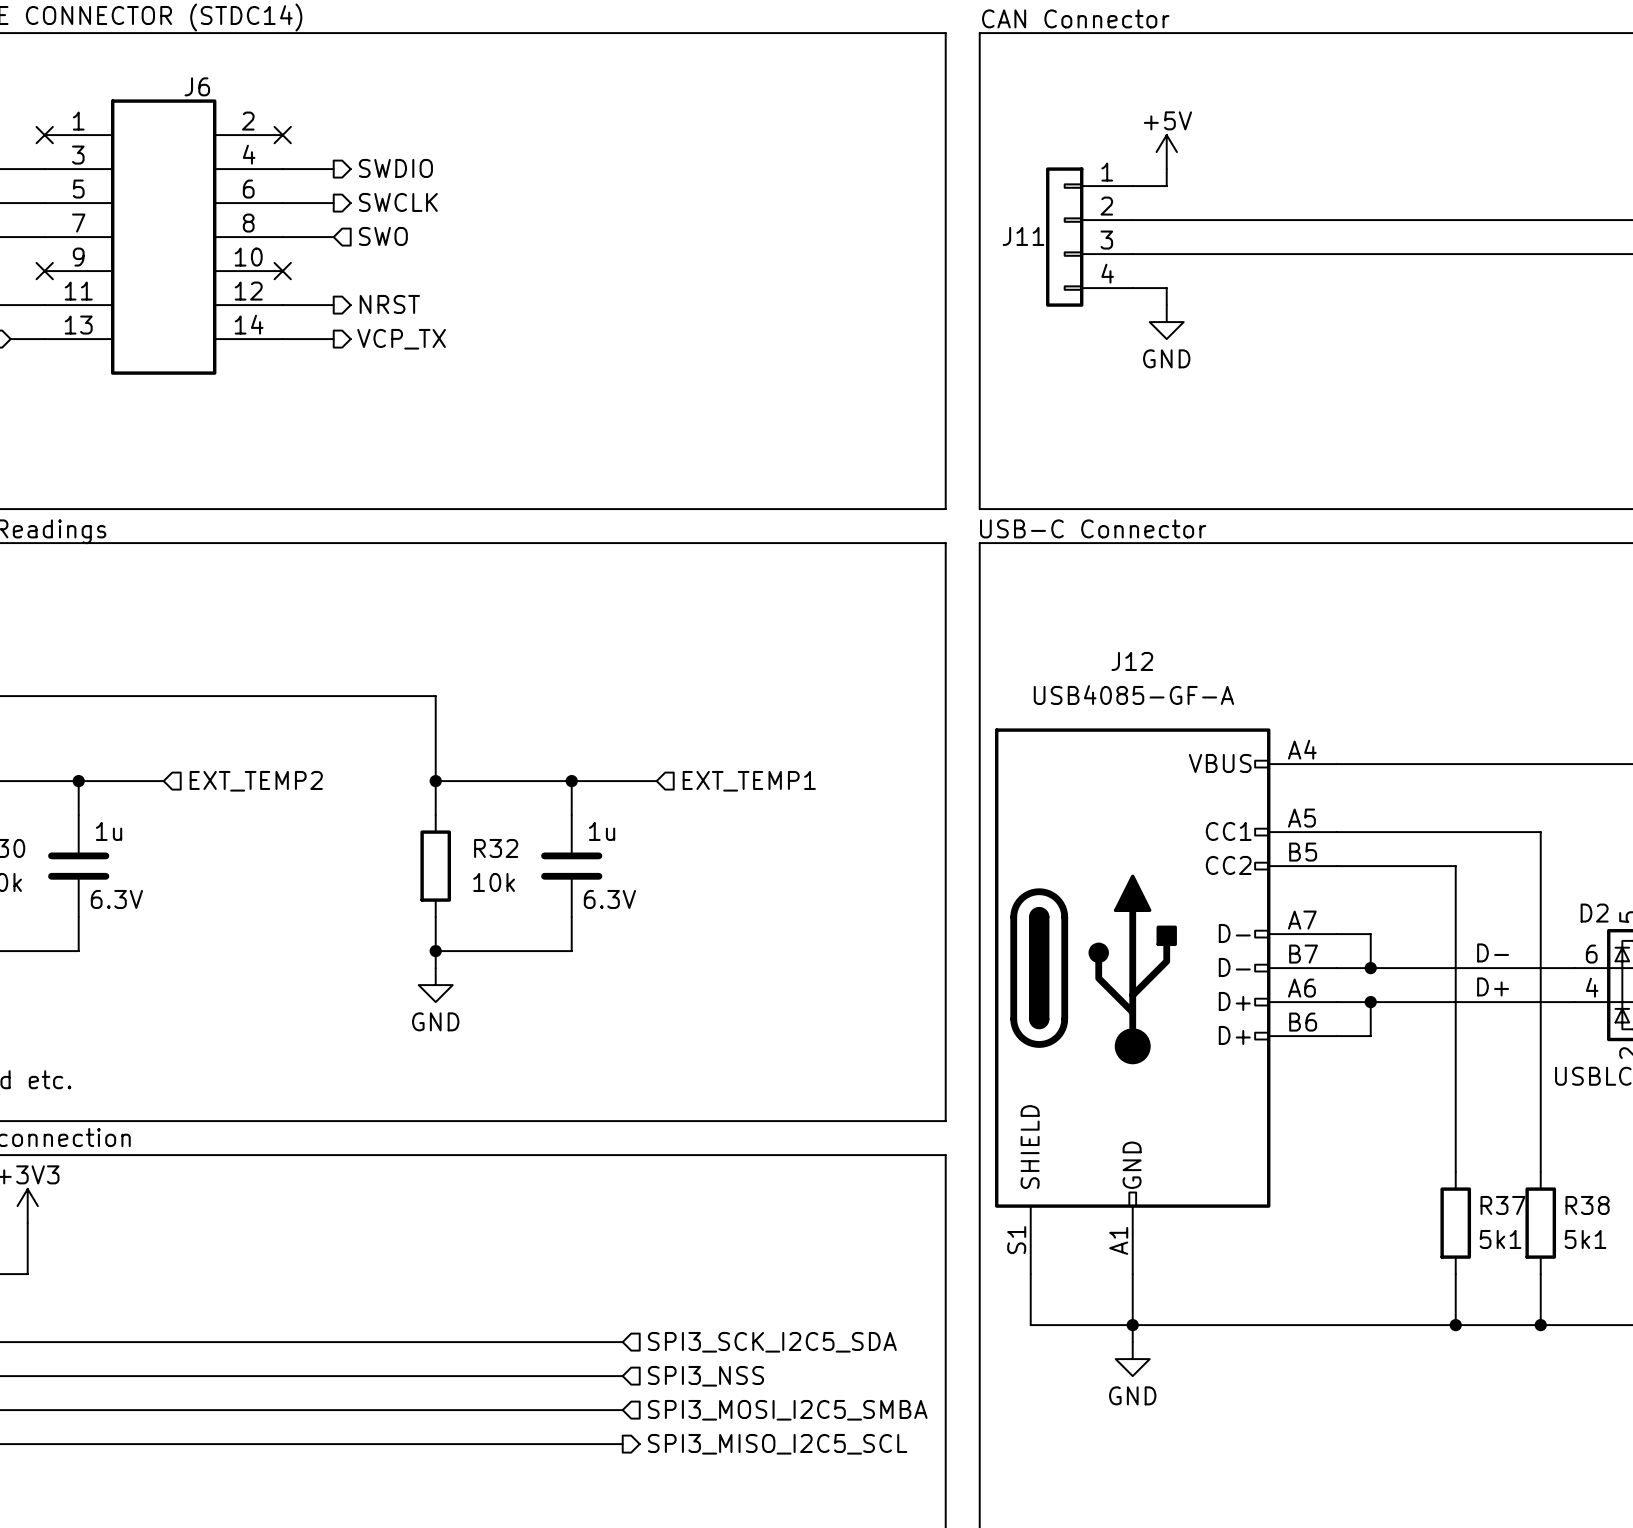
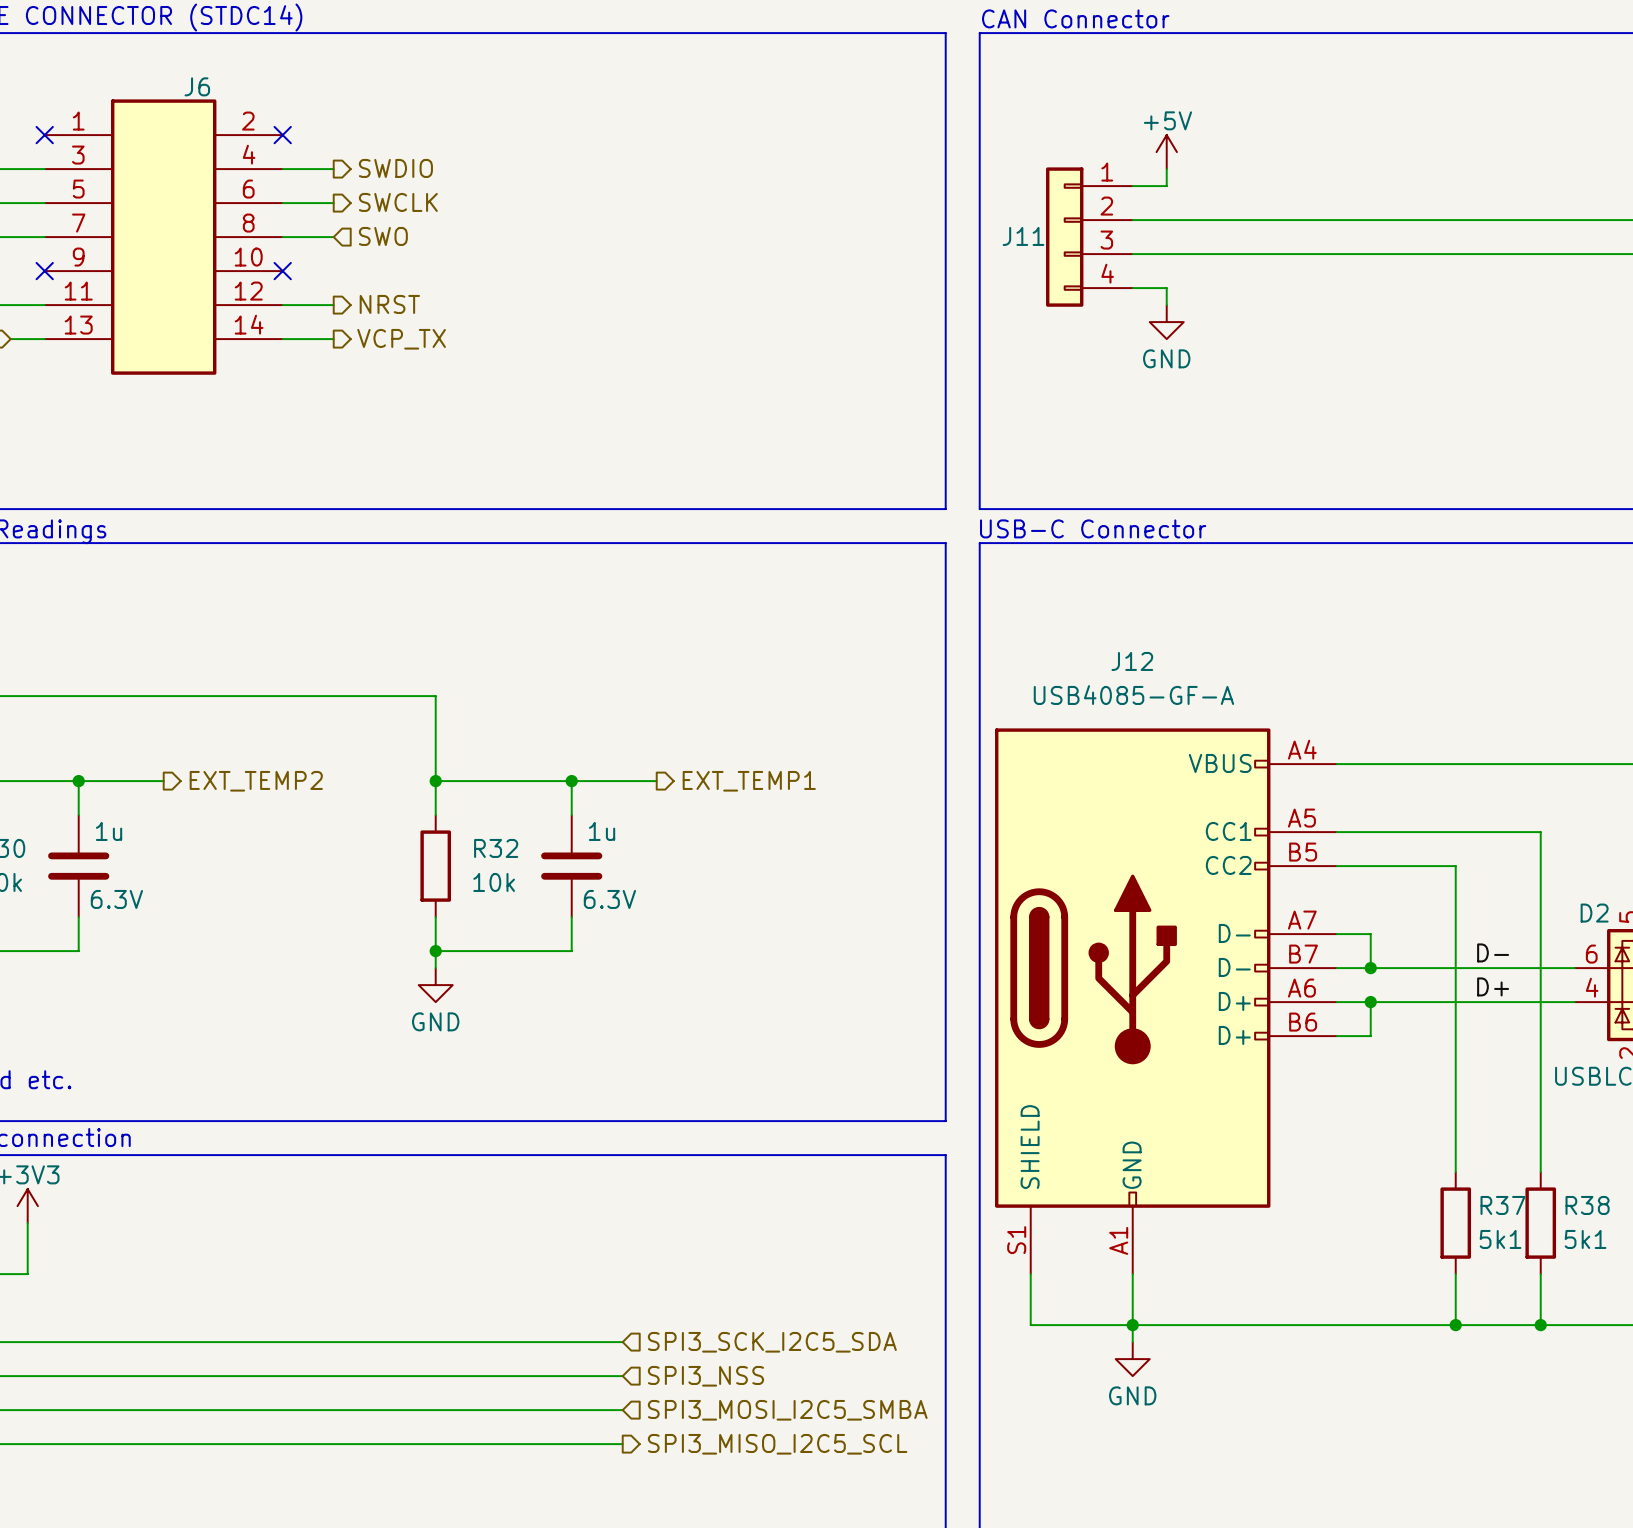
hierarchical label shape: input (256, 781) -> output (256, 781)
hierarchical label shape: input (749, 781) -> output (749, 781)

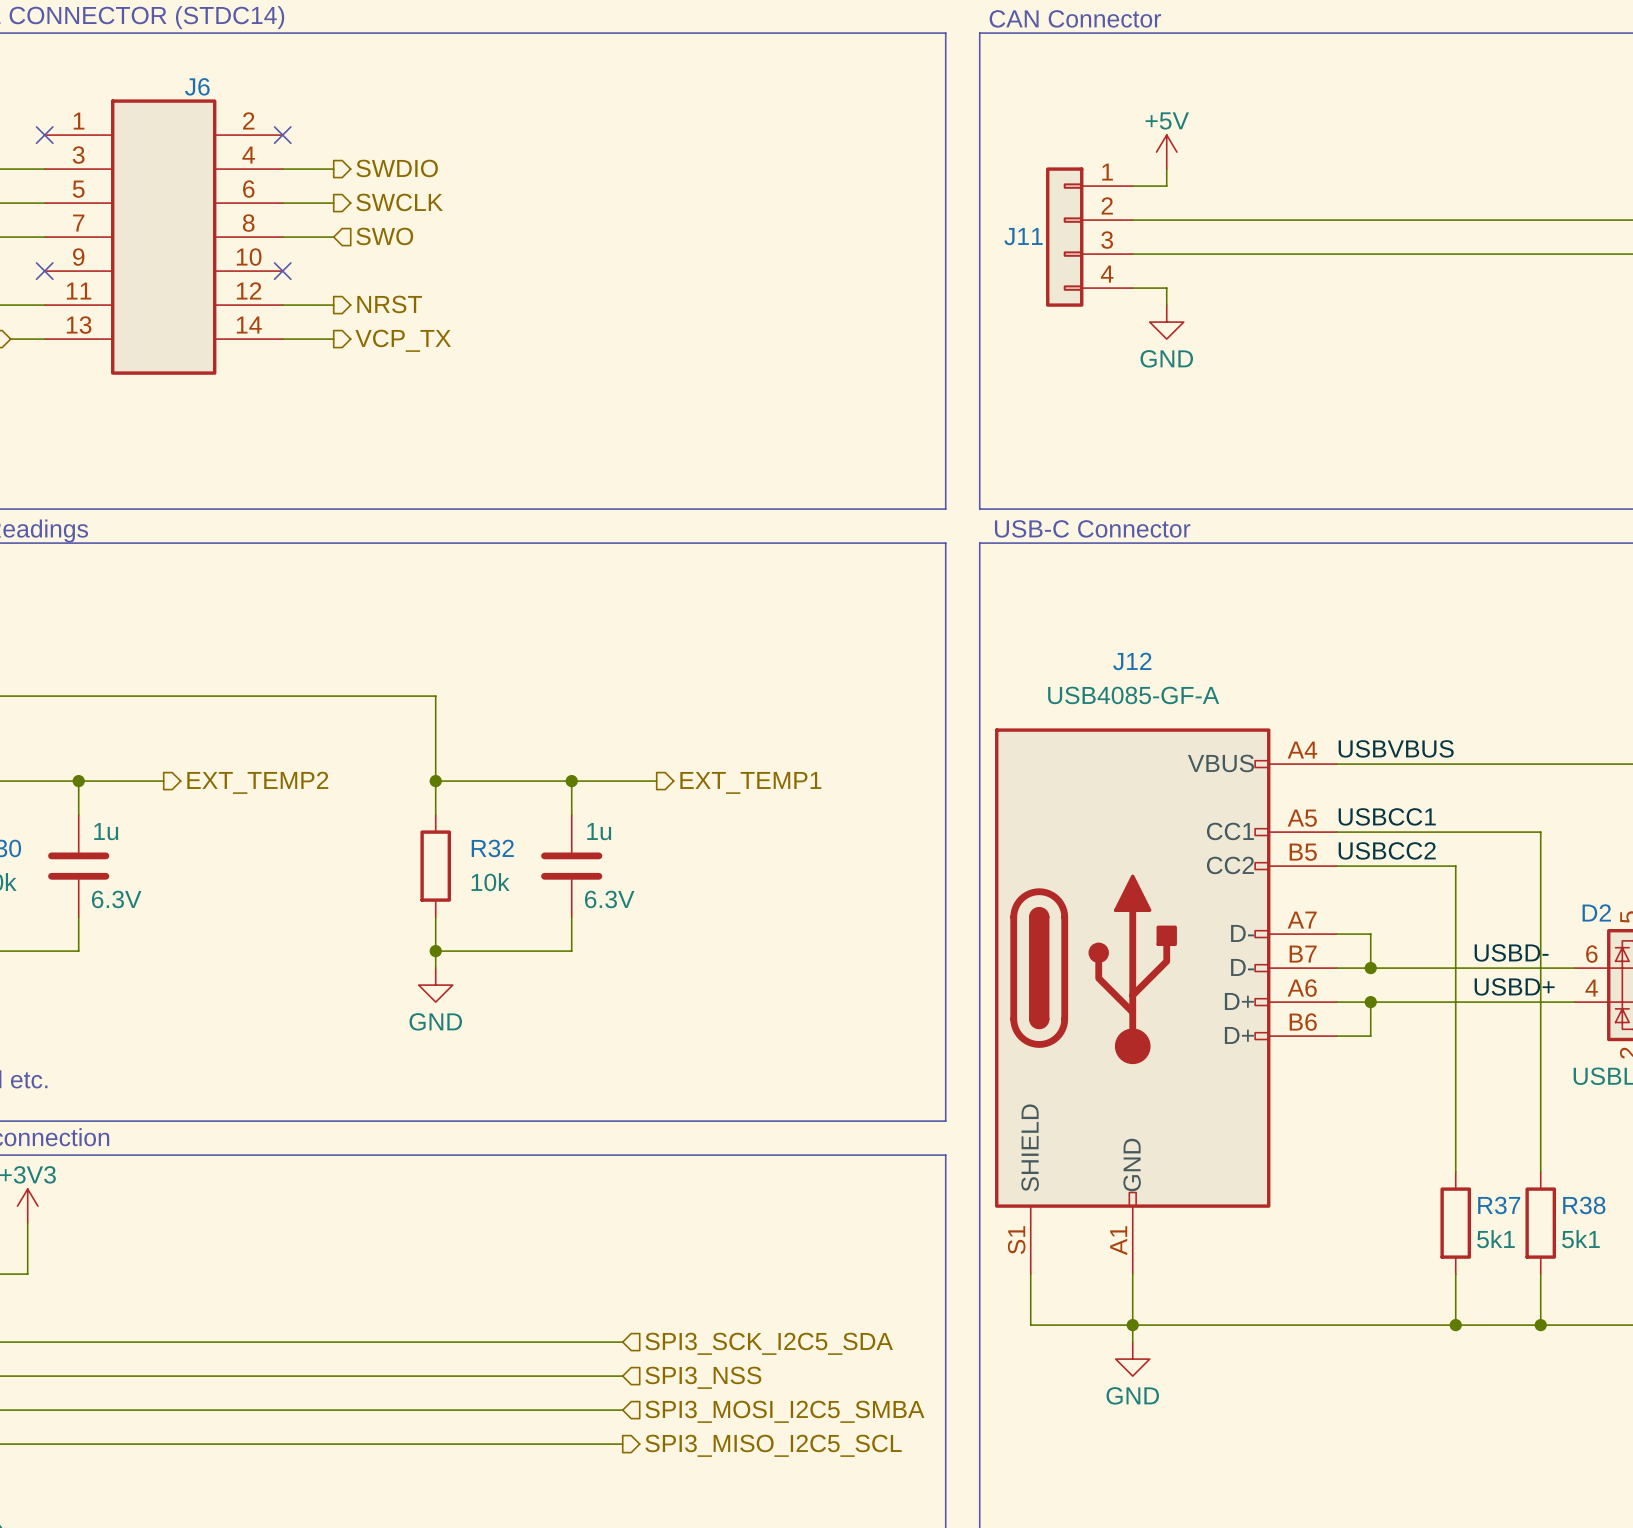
label: none -> USBVBUS (1396, 748)
label: none -> USBCC1 (1387, 816)
label: none -> USBCC2 (1387, 850)
label: D- (1493, 952) -> USBD- (1511, 952)
label: D+ (1493, 986) -> USBD+ (1514, 986)

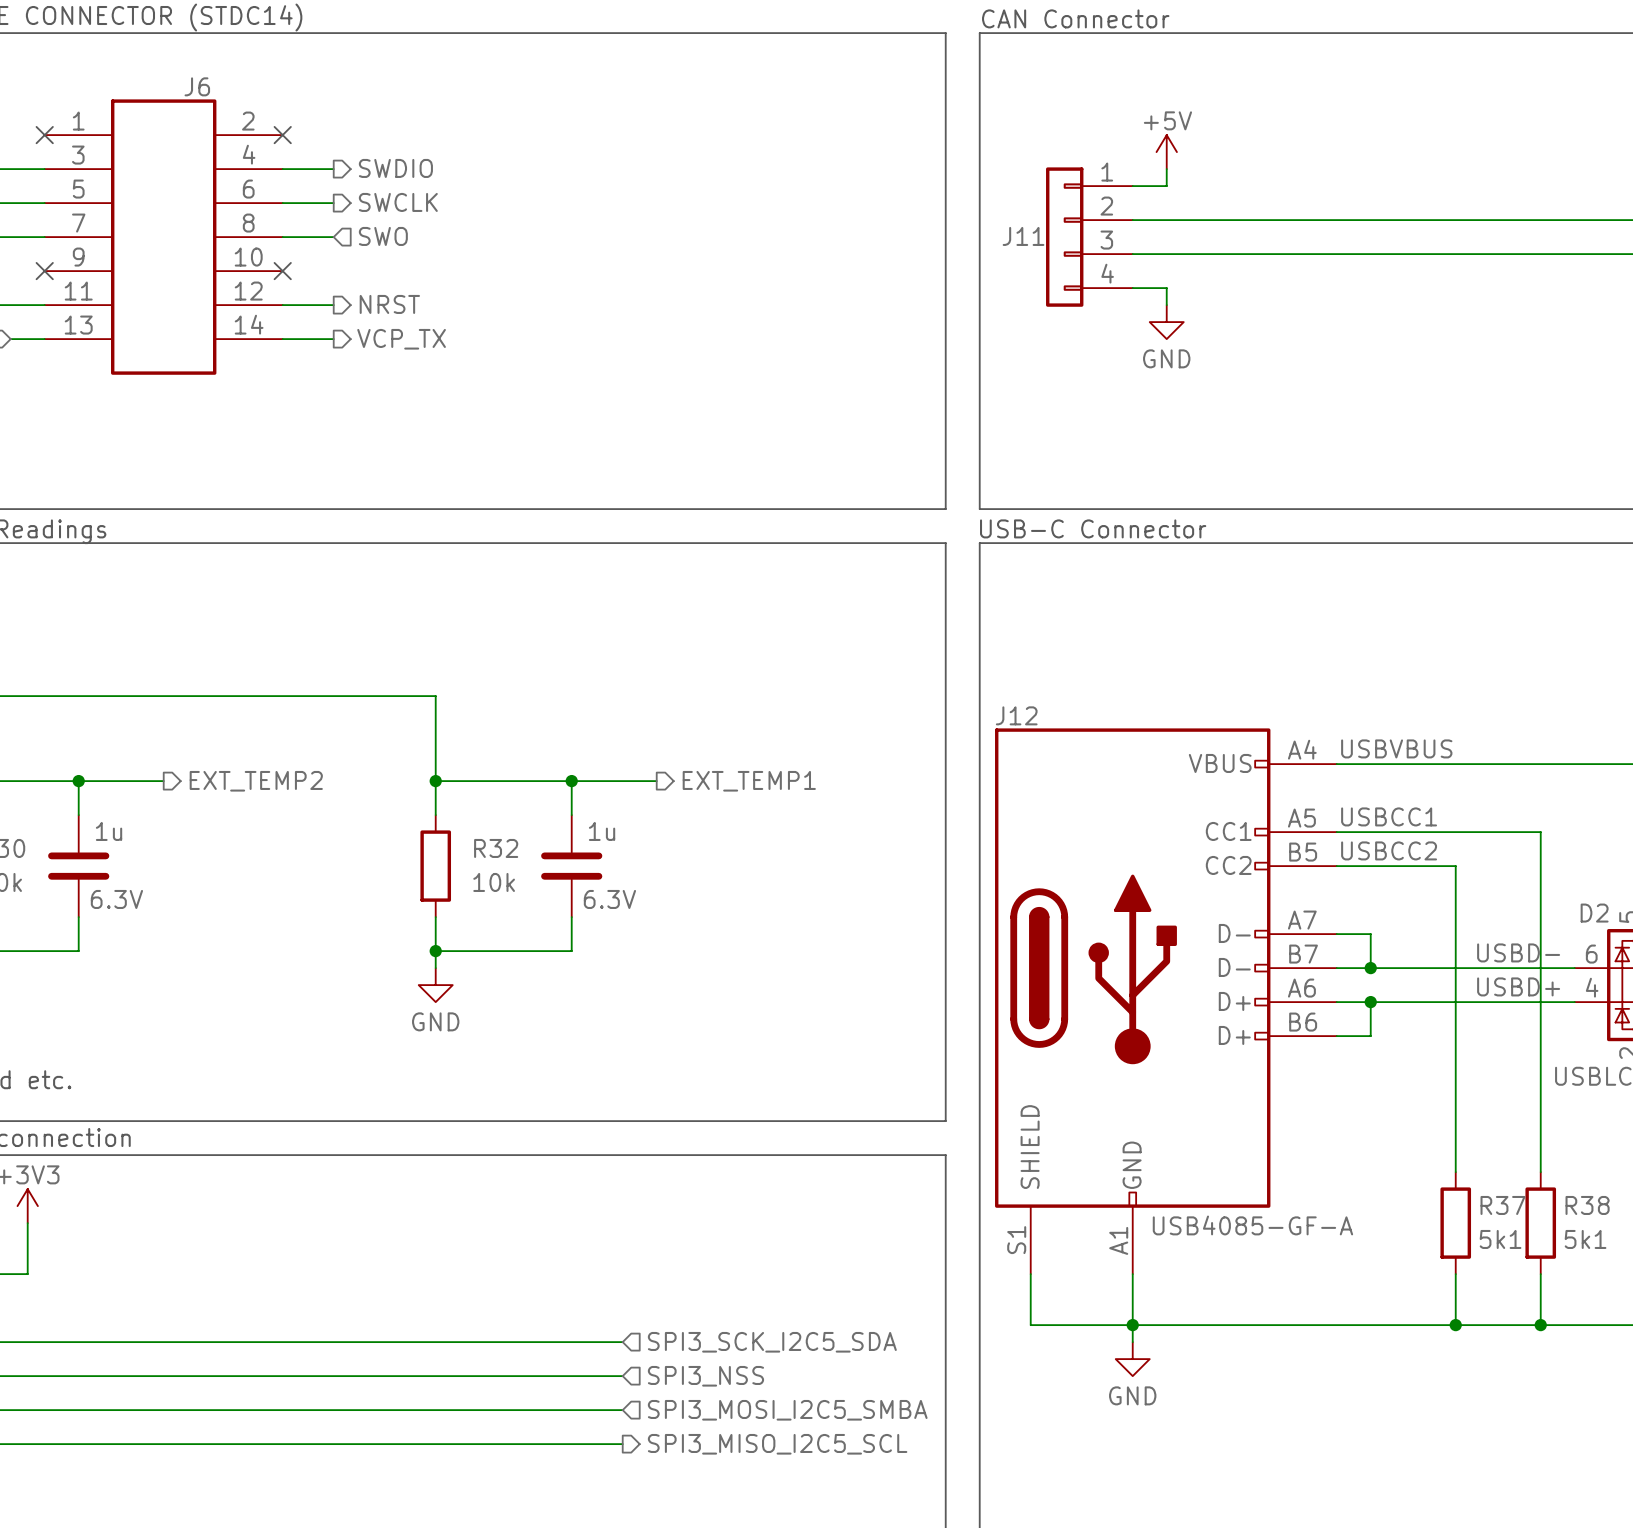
J12 name position: J12 (1132, 661) -> J12 (1016, 715)
J12 value position: USB4085-GF-A (1133, 695) -> USB4085-GF-A (1252, 1225)

